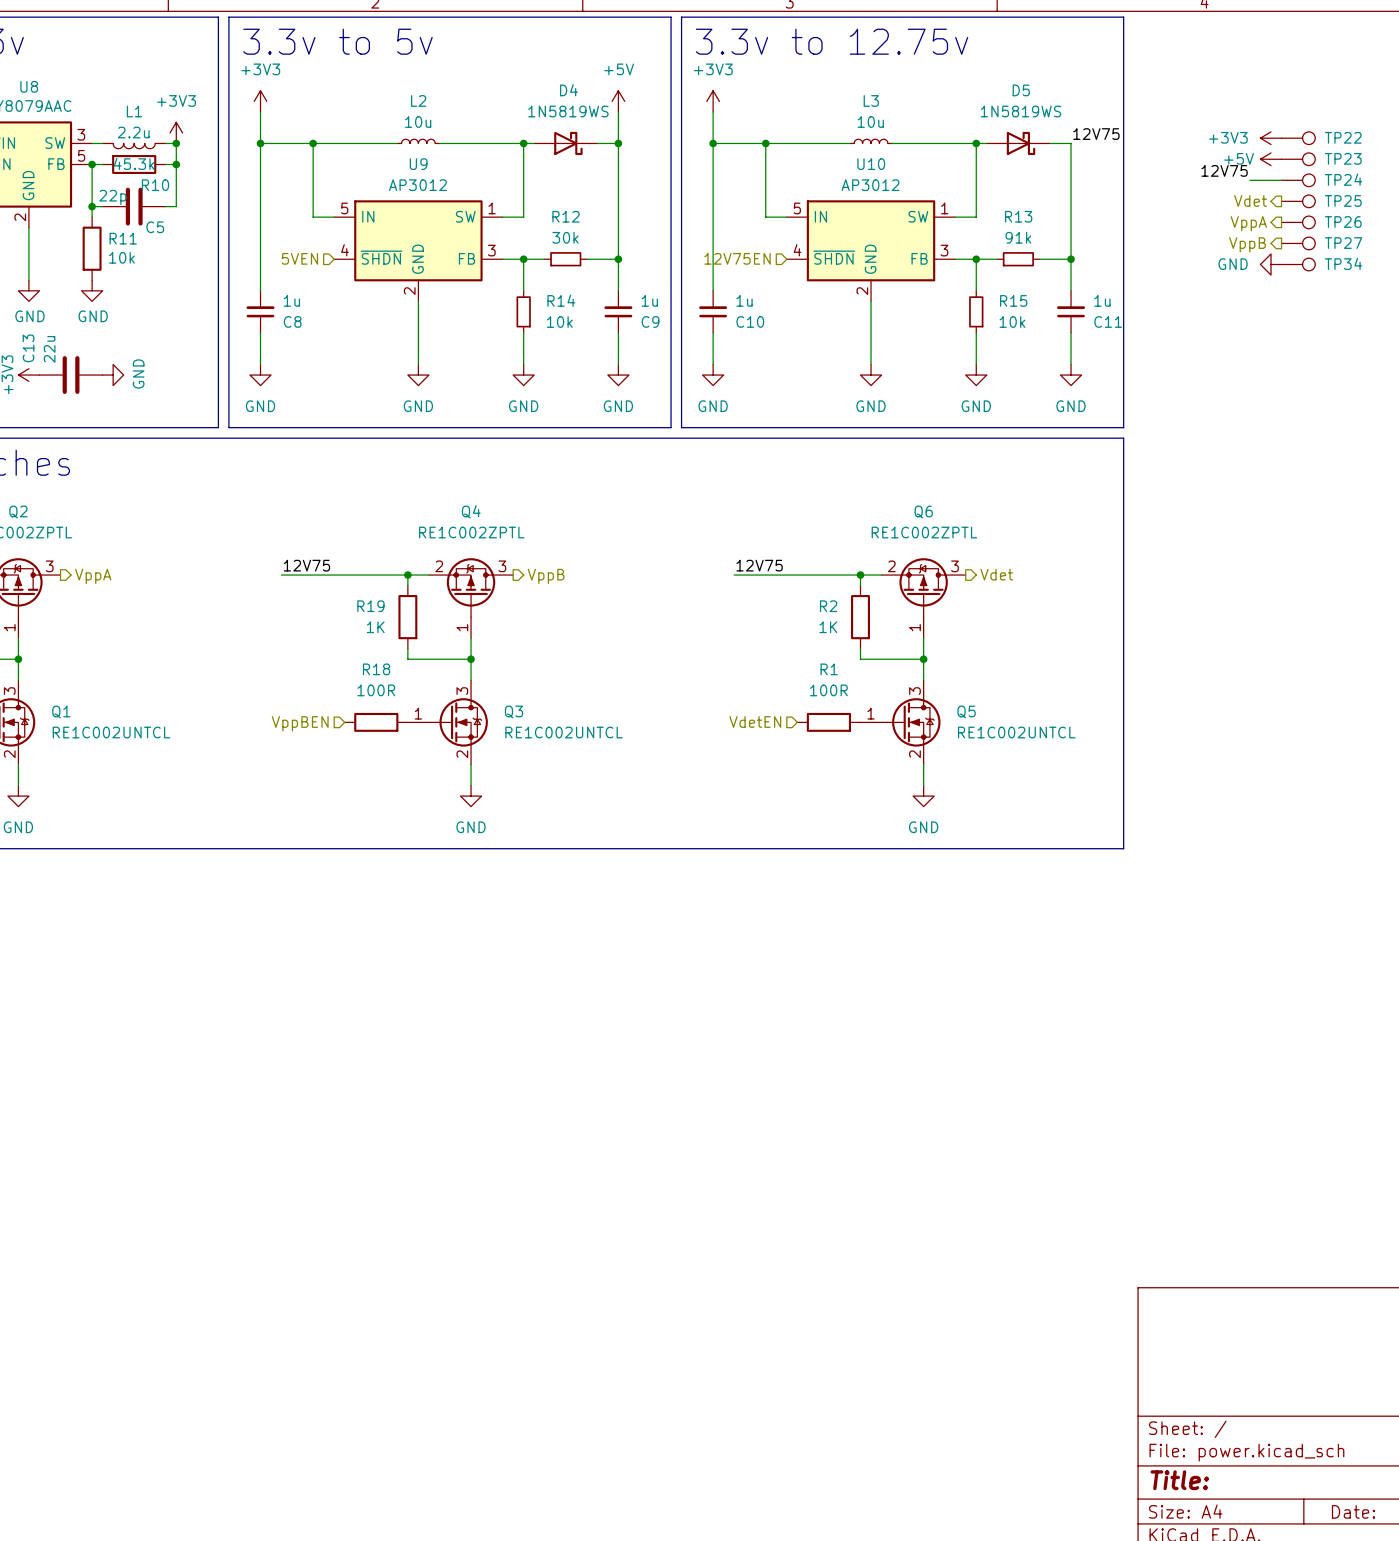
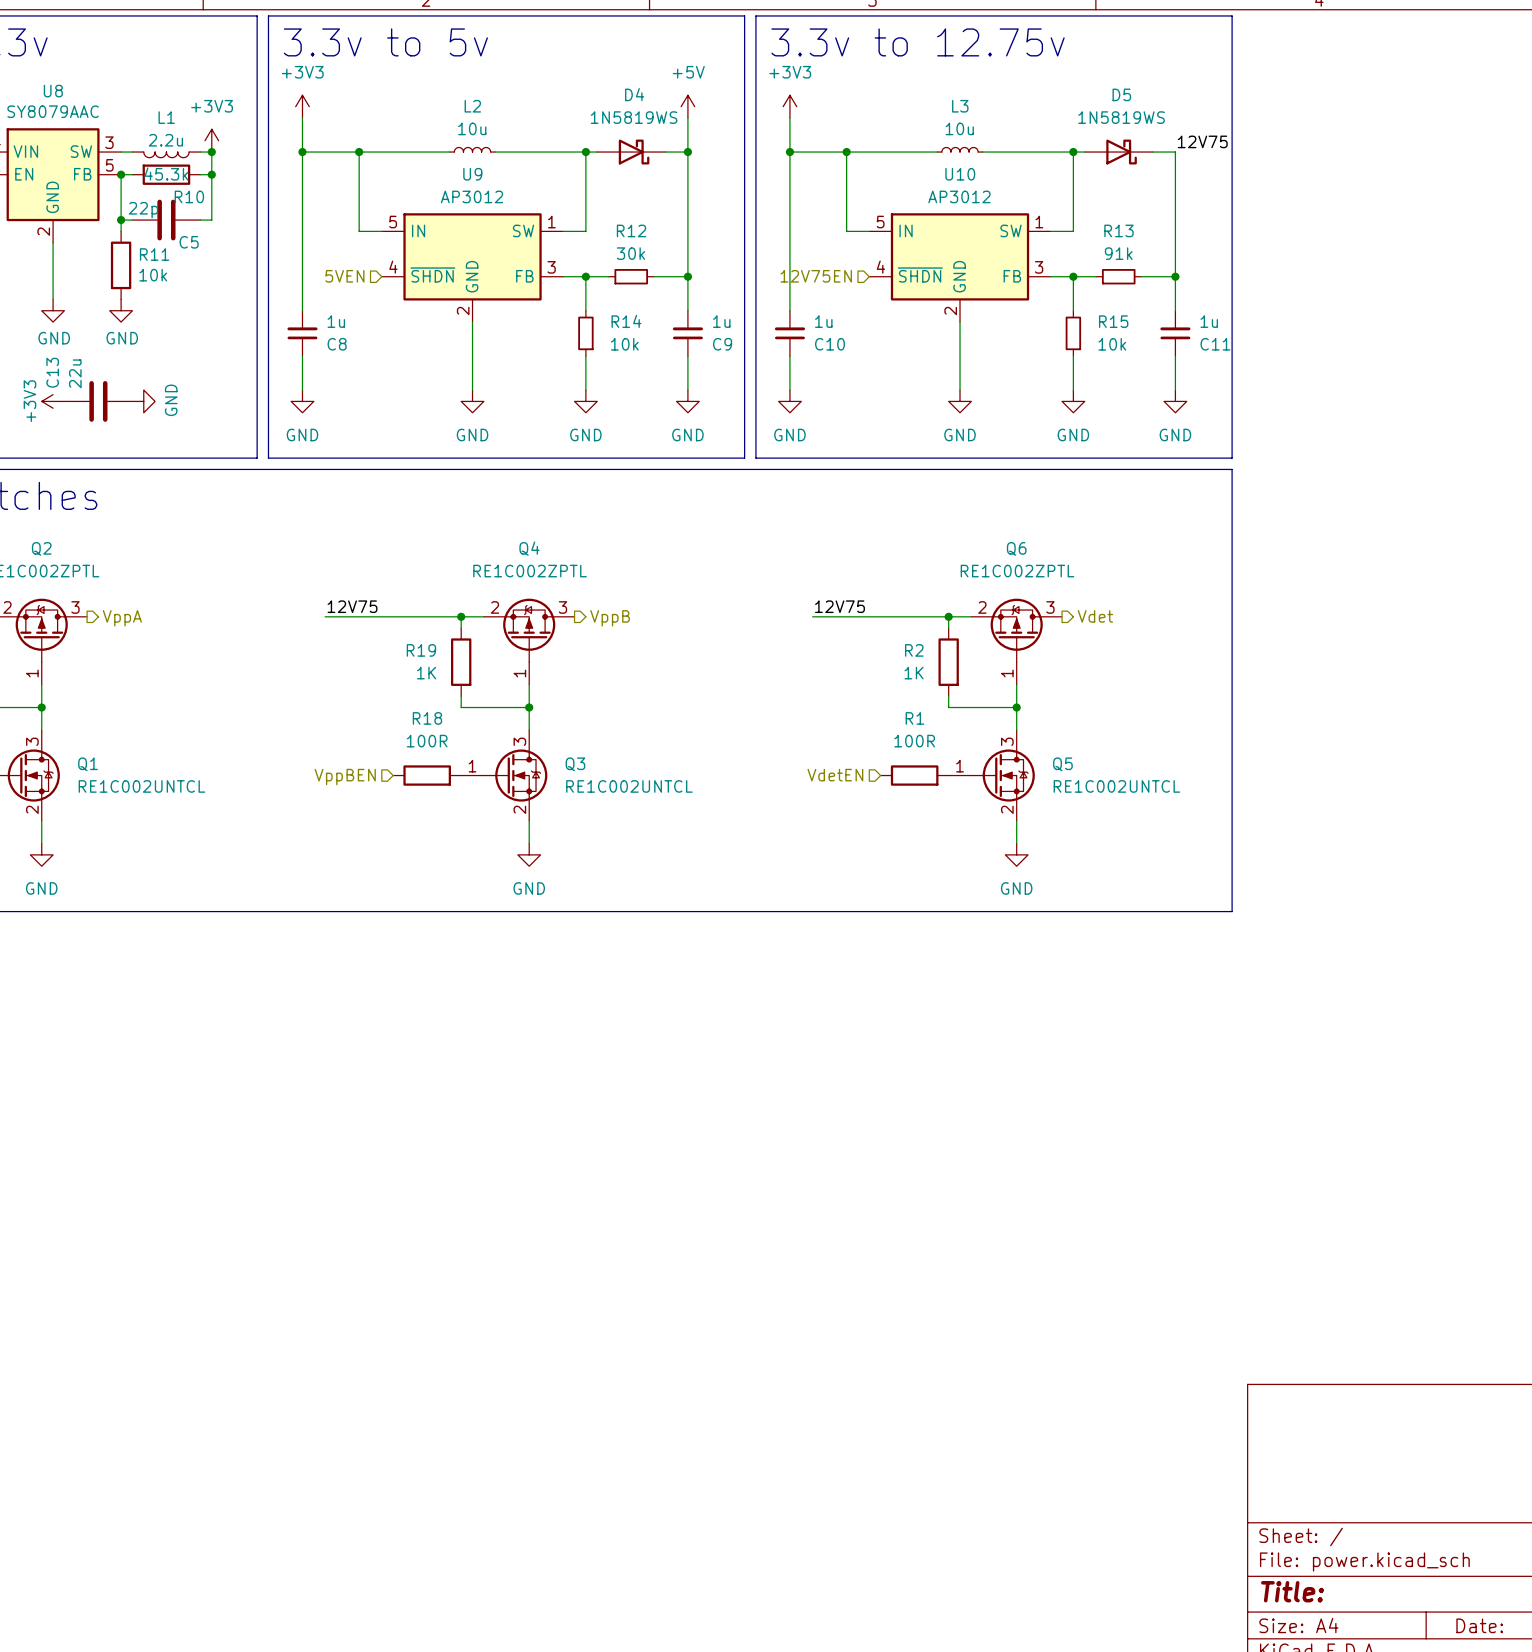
power symbol: +3V3 (1271, 138) -> none
TP22: (1298, 138) -> none
power symbol: +5V (1271, 159) -> none
TP23: (1298, 159) -> none
label: 12V75 (1224, 170) -> none
wire: (1249, 180) (1281, 180) -> none
TP24: (1298, 180) -> none
hierarchical label: Vdet (1250, 200) -> none
TP25: (1298, 201) -> none
TP26: (1298, 222) -> none
hierarchical label: VppA (1248, 223) -> none
TP27: (1298, 243) -> none
hierarchical label: VppB (1247, 244) -> none
power symbol: GND (1271, 264) -> none
TP34: (1298, 264) -> none

